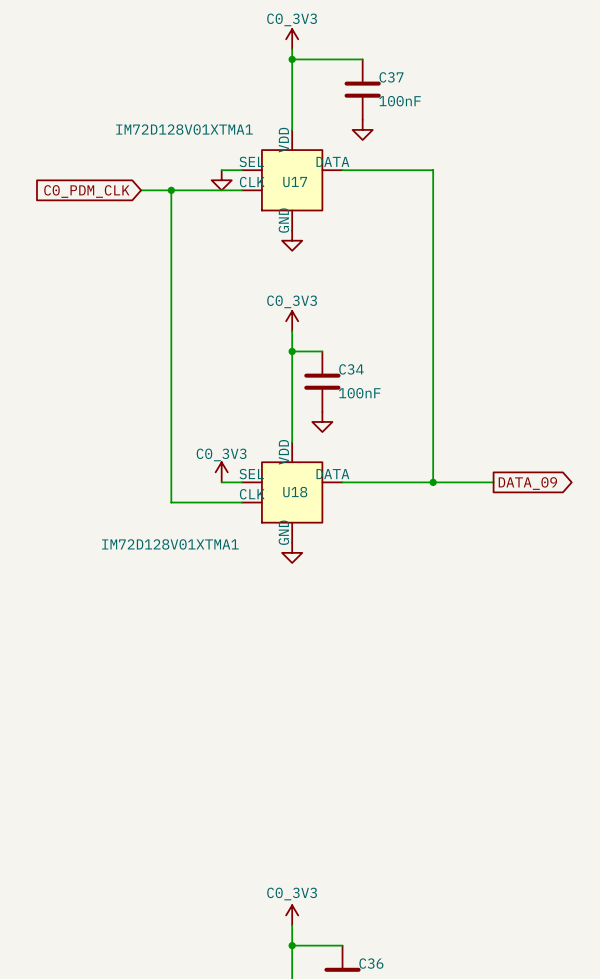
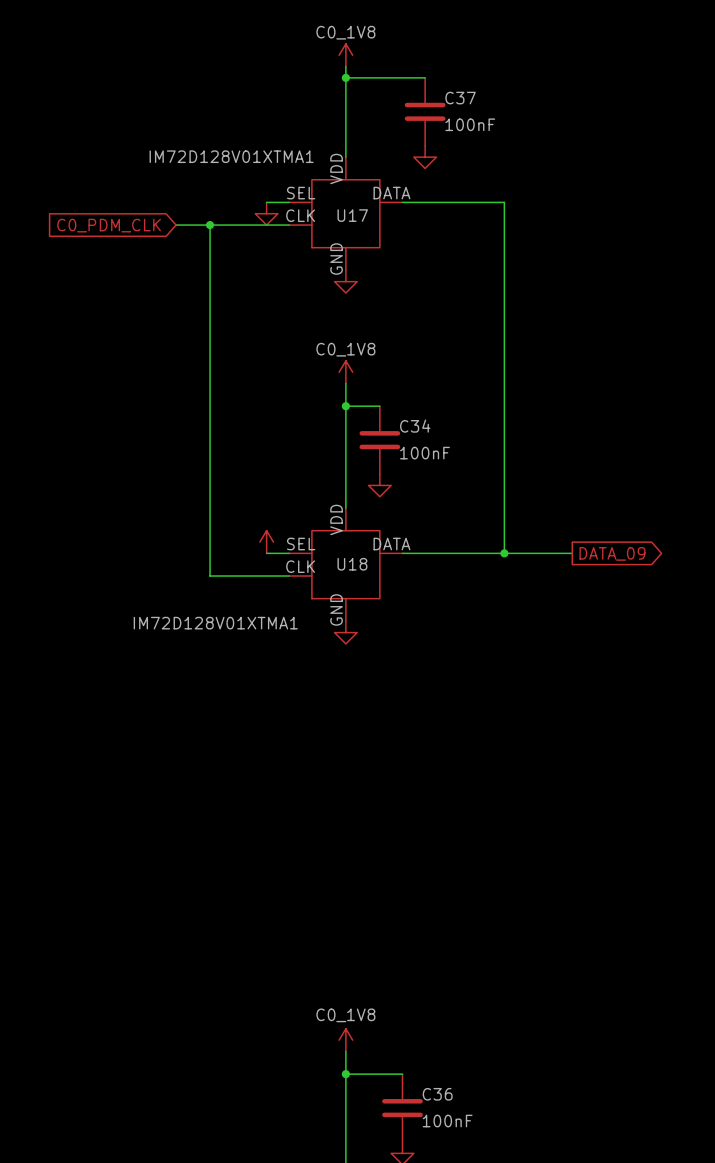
power symbol: C0_3V3 (292, 39) -> C0_1V8 (345, 55)
power symbol: C0_3V3 (292, 321) -> C0_1V8 (345, 372)
power symbol text: C0_3V3 (221, 454) -> none
power symbol: C0_3V3 (292, 915) -> C0_1V8 (345, 1040)

